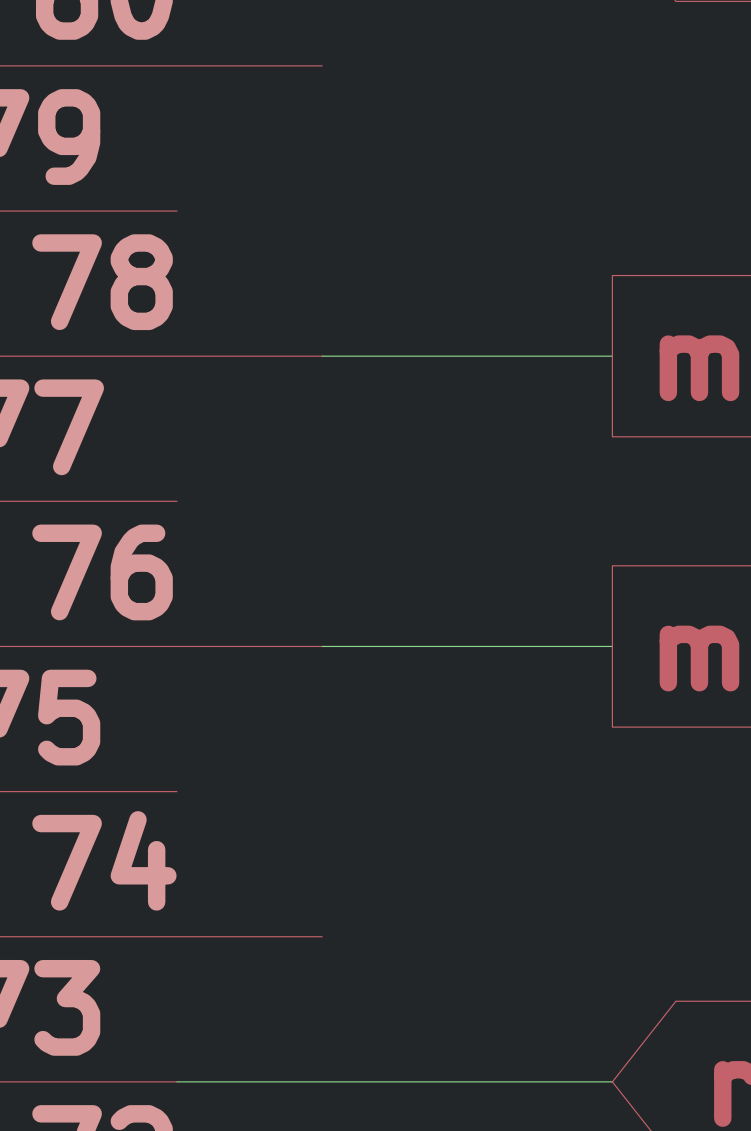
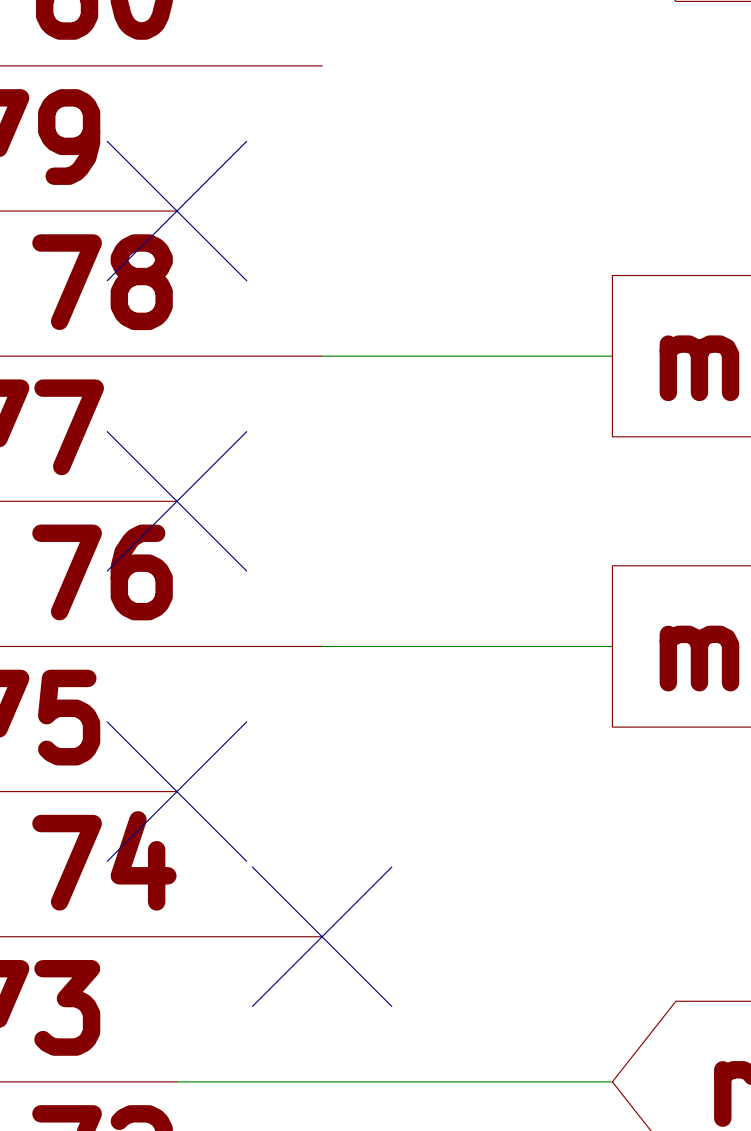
no-connect mark: none -> (176, 211)
no-connect mark: none -> (176, 501)
no-connect mark: none -> (176, 791)
no-connect mark: none -> (322, 936)

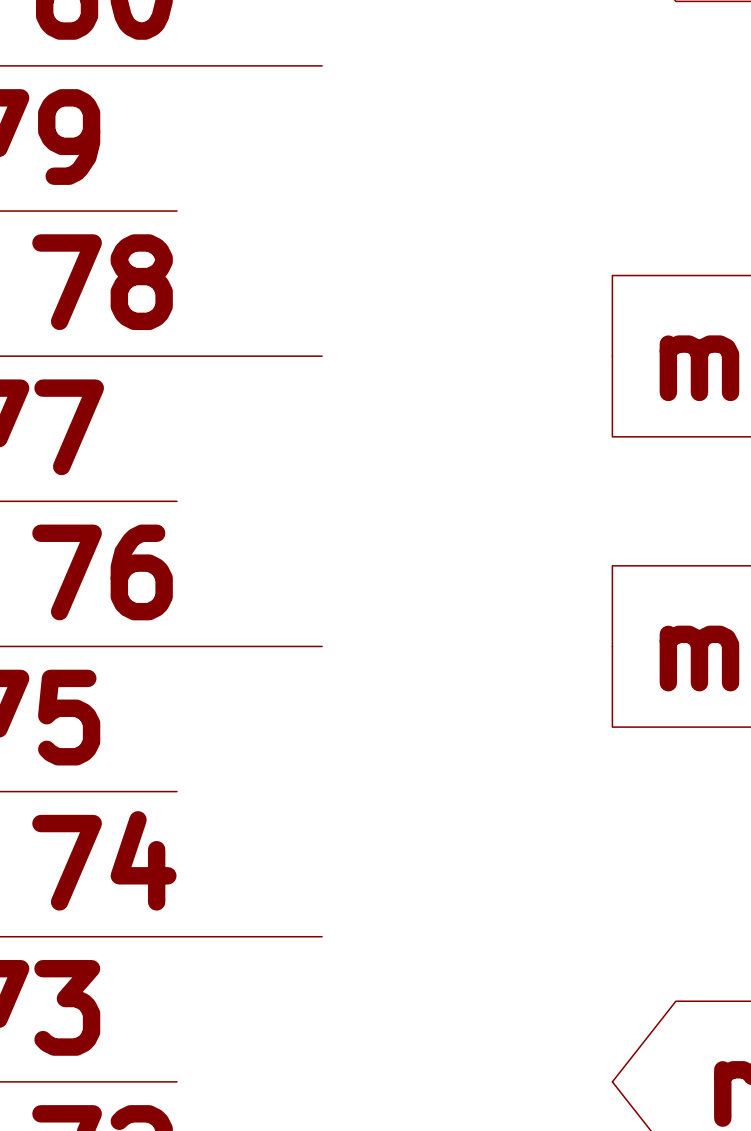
no-connect mark: (176, 211) -> none
wire: (322, 356) (612, 356) -> none
no-connect mark: (176, 501) -> none
wire: (322, 646) (612, 646) -> none
no-connect mark: (176, 791) -> none
no-connect mark: (322, 936) -> none
wire: (176, 1081) (612, 1081) -> none

